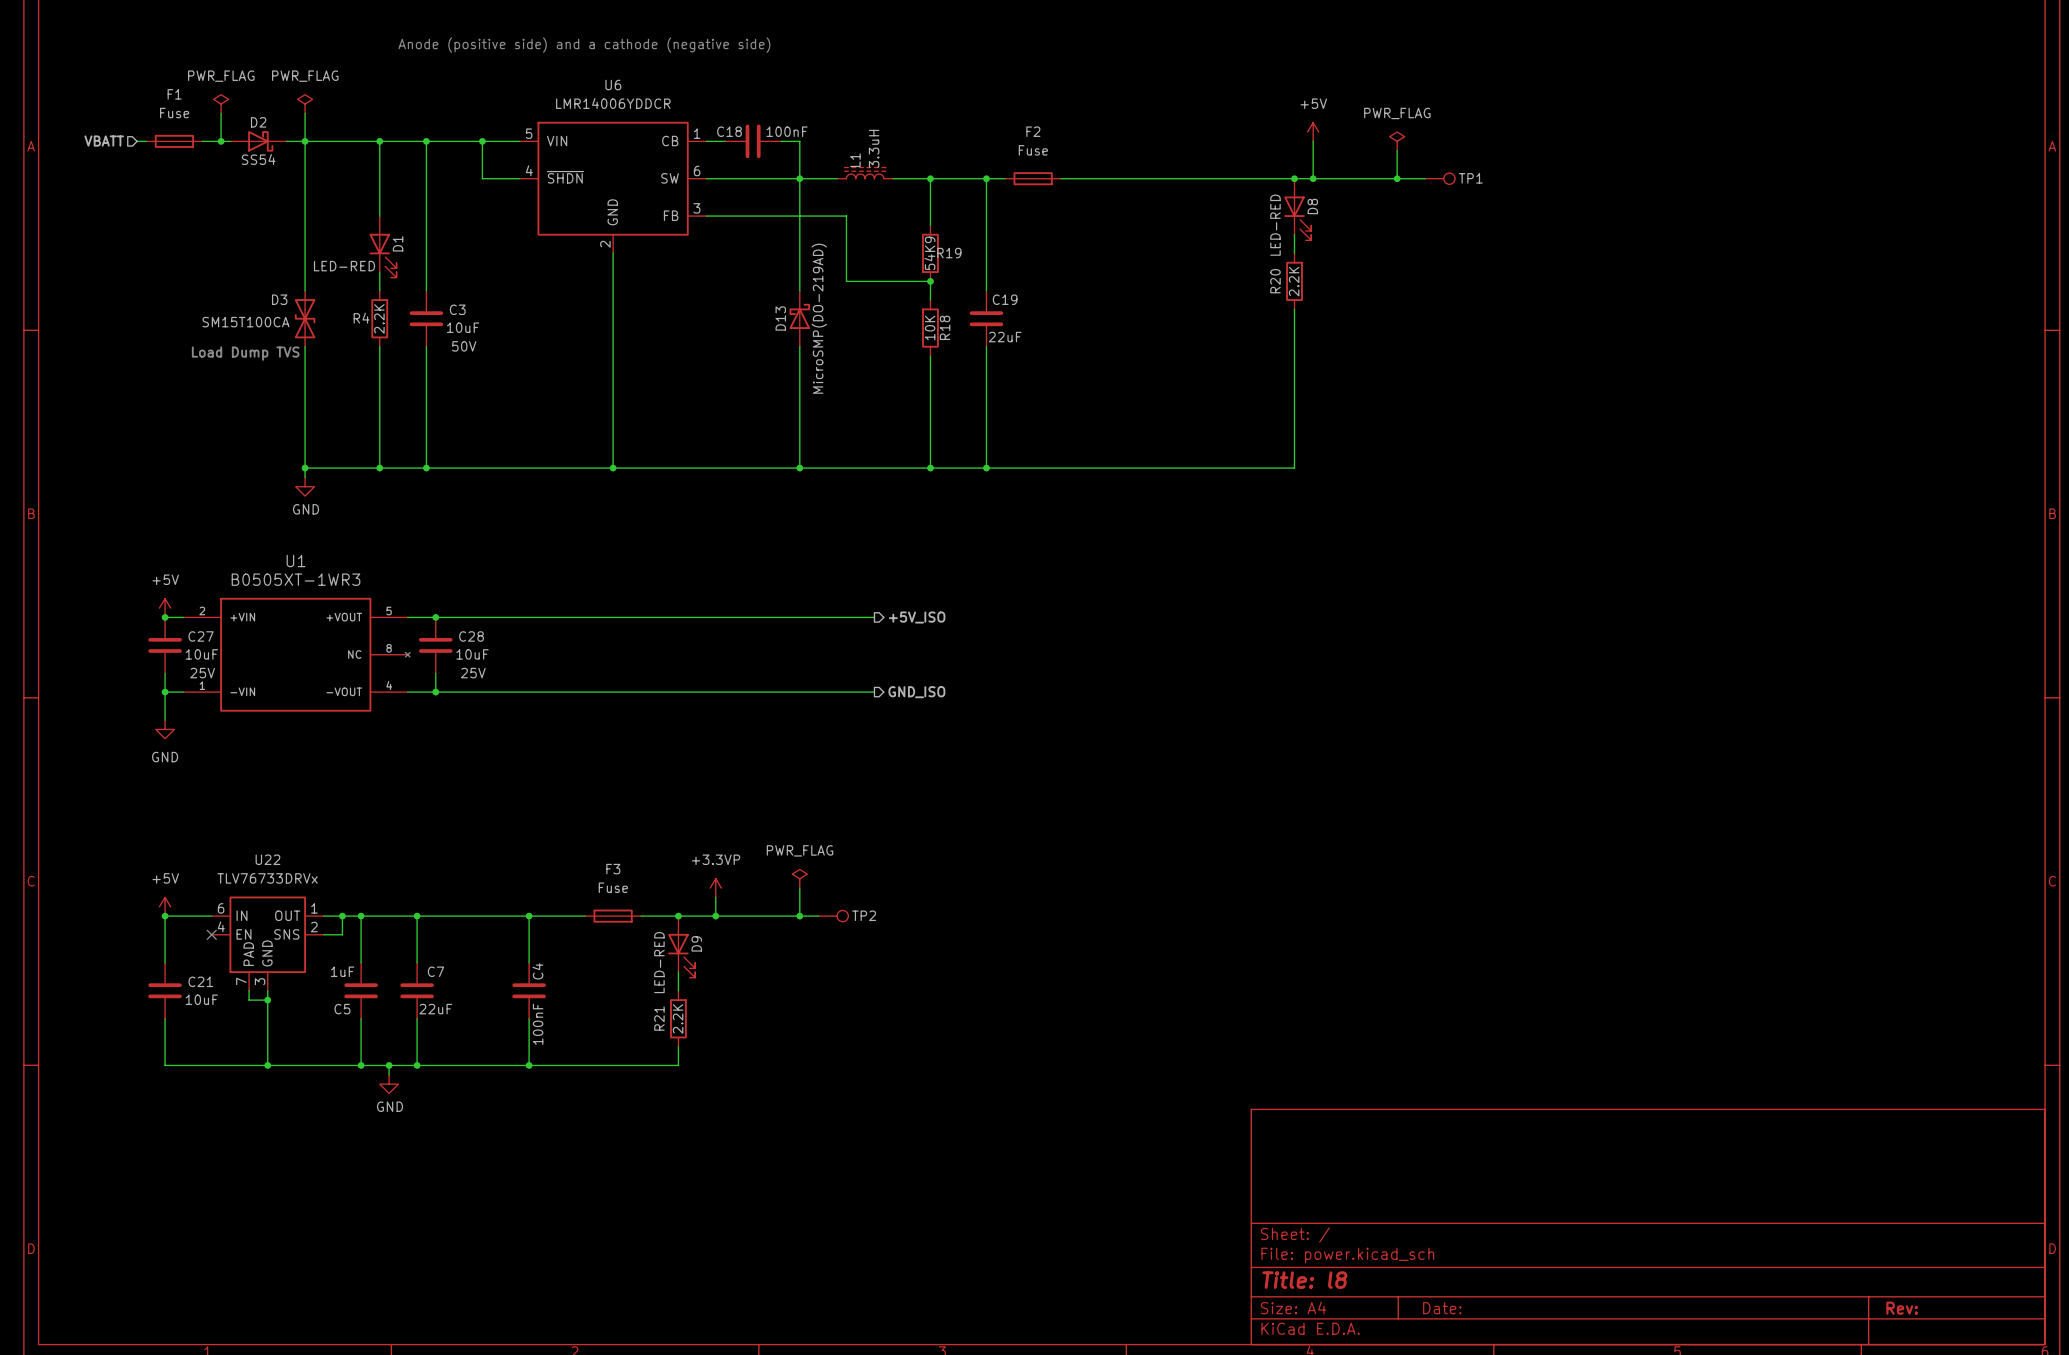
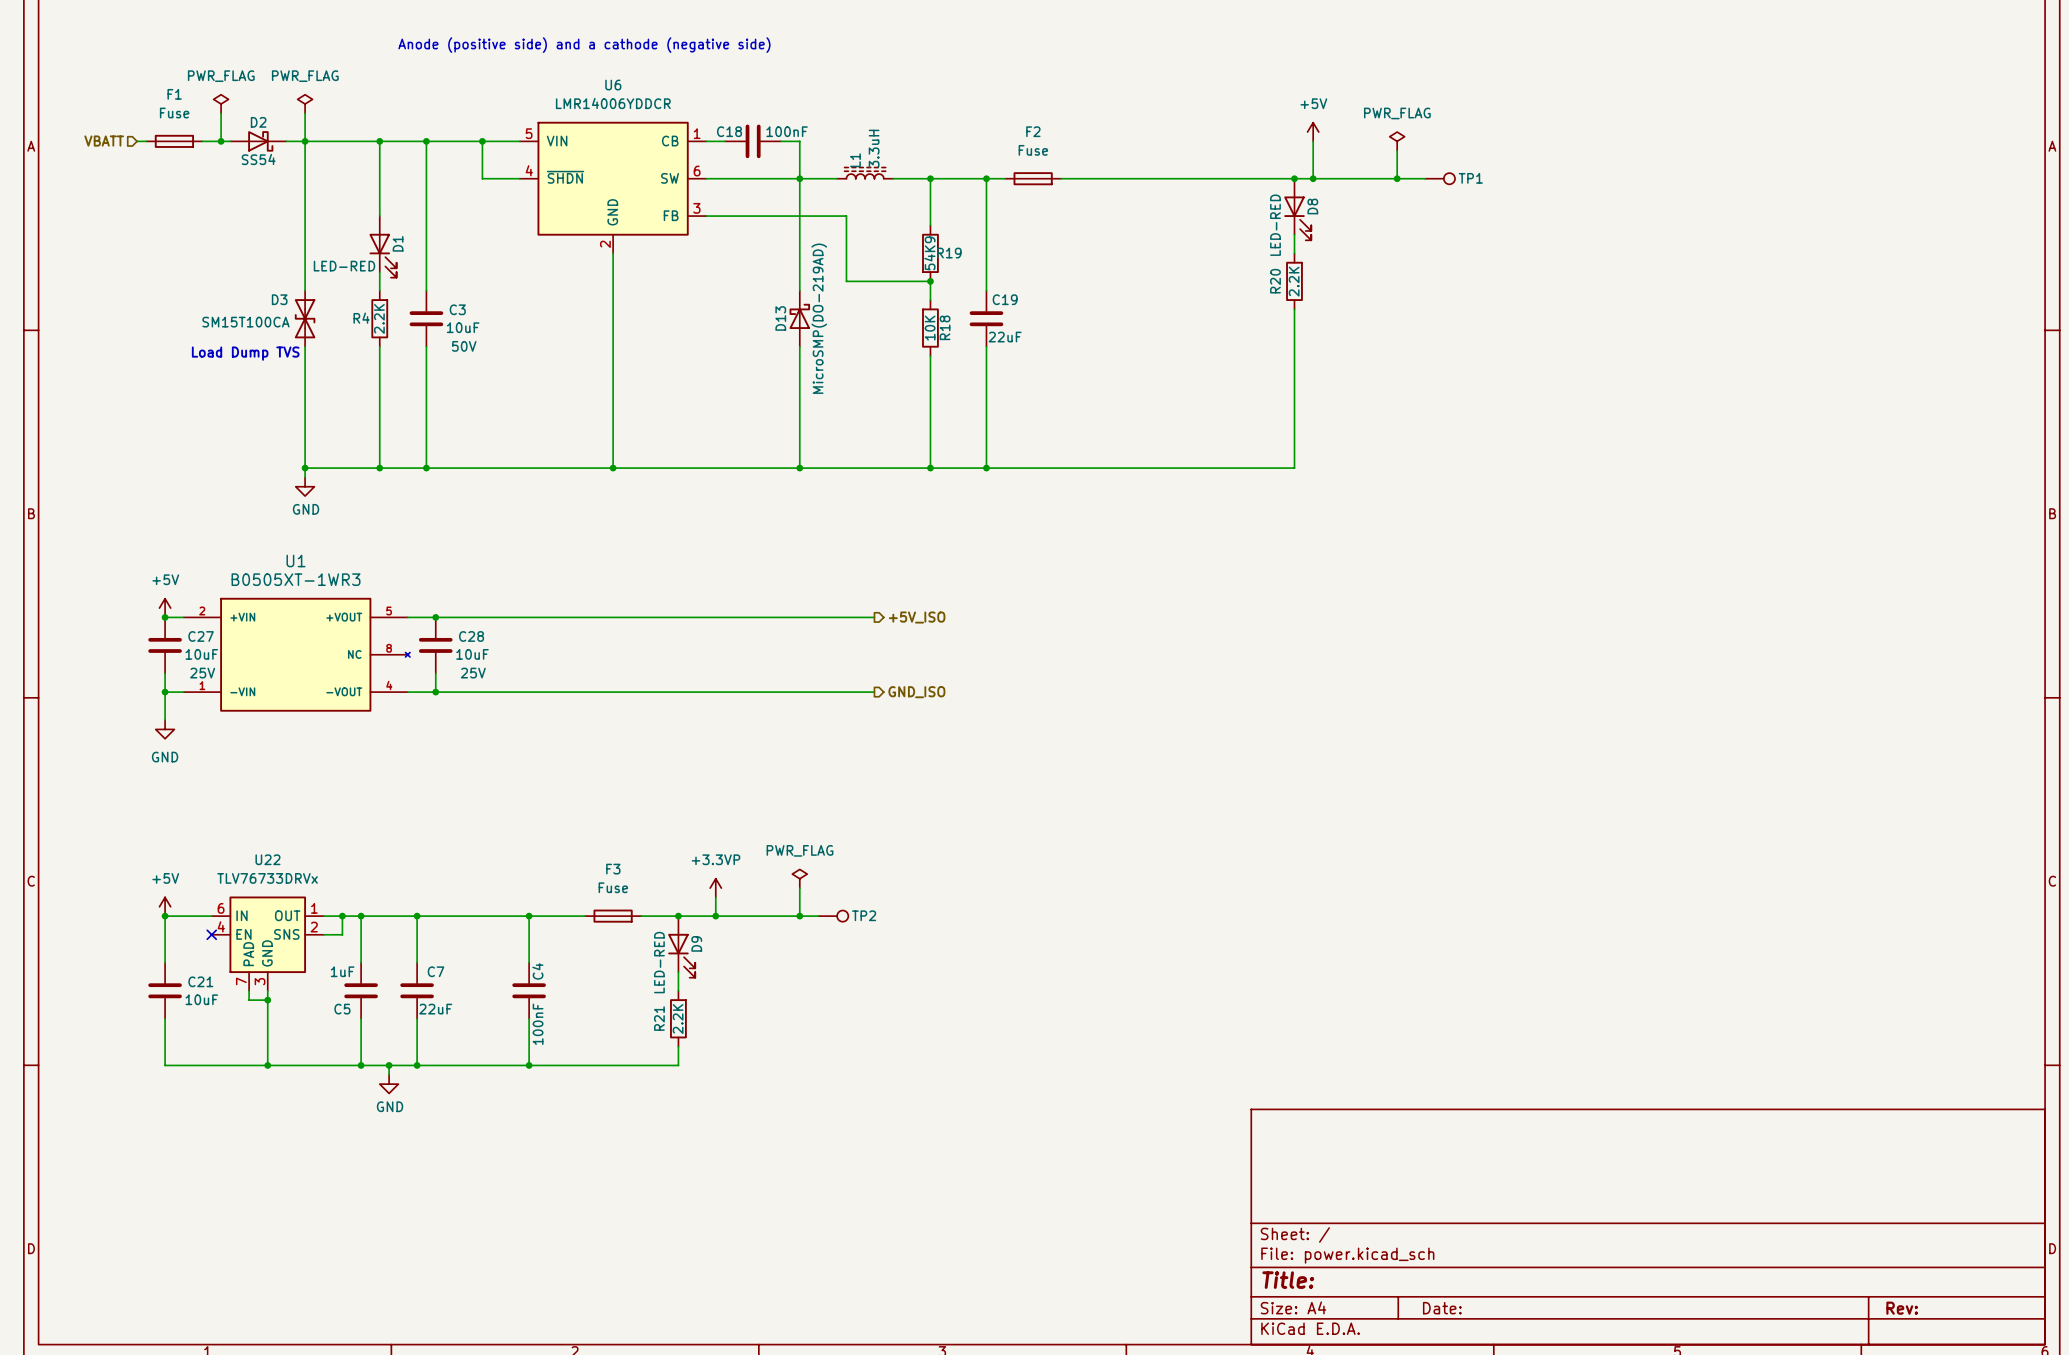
title block: Title: l8 (1304, 1280) -> Title: (1288, 1280)

